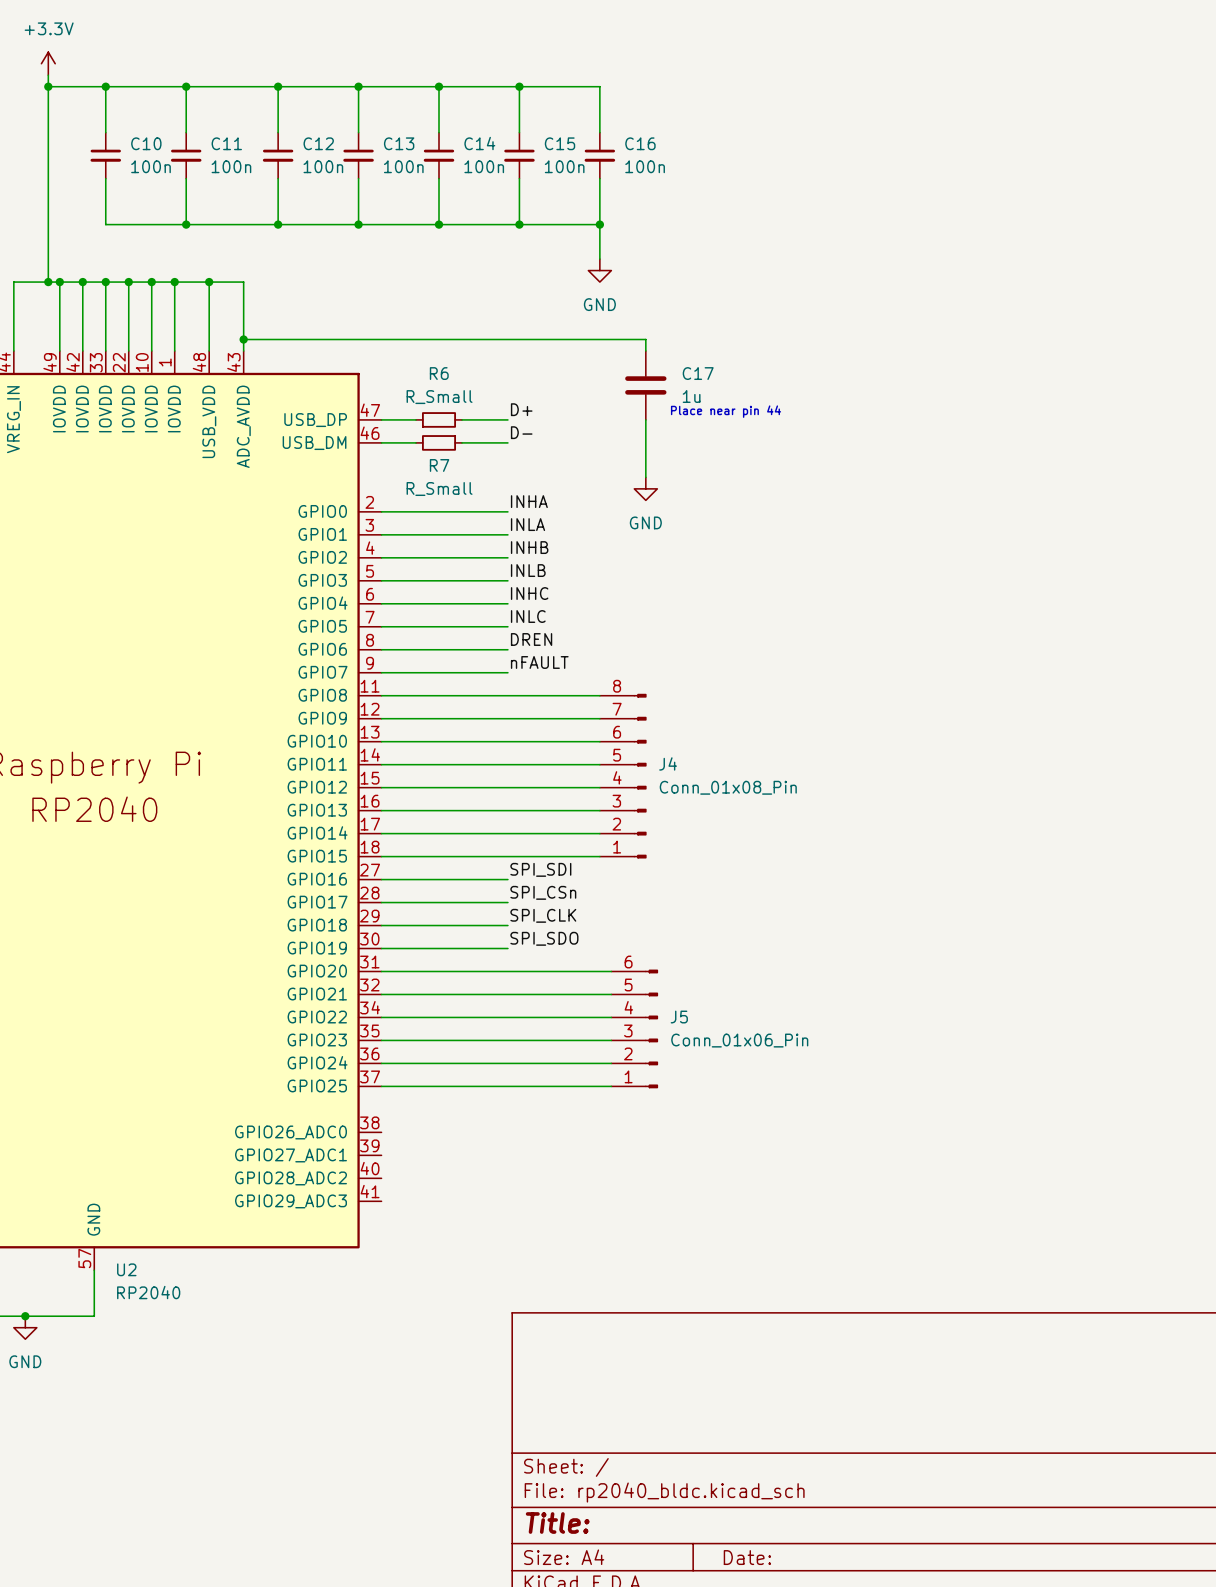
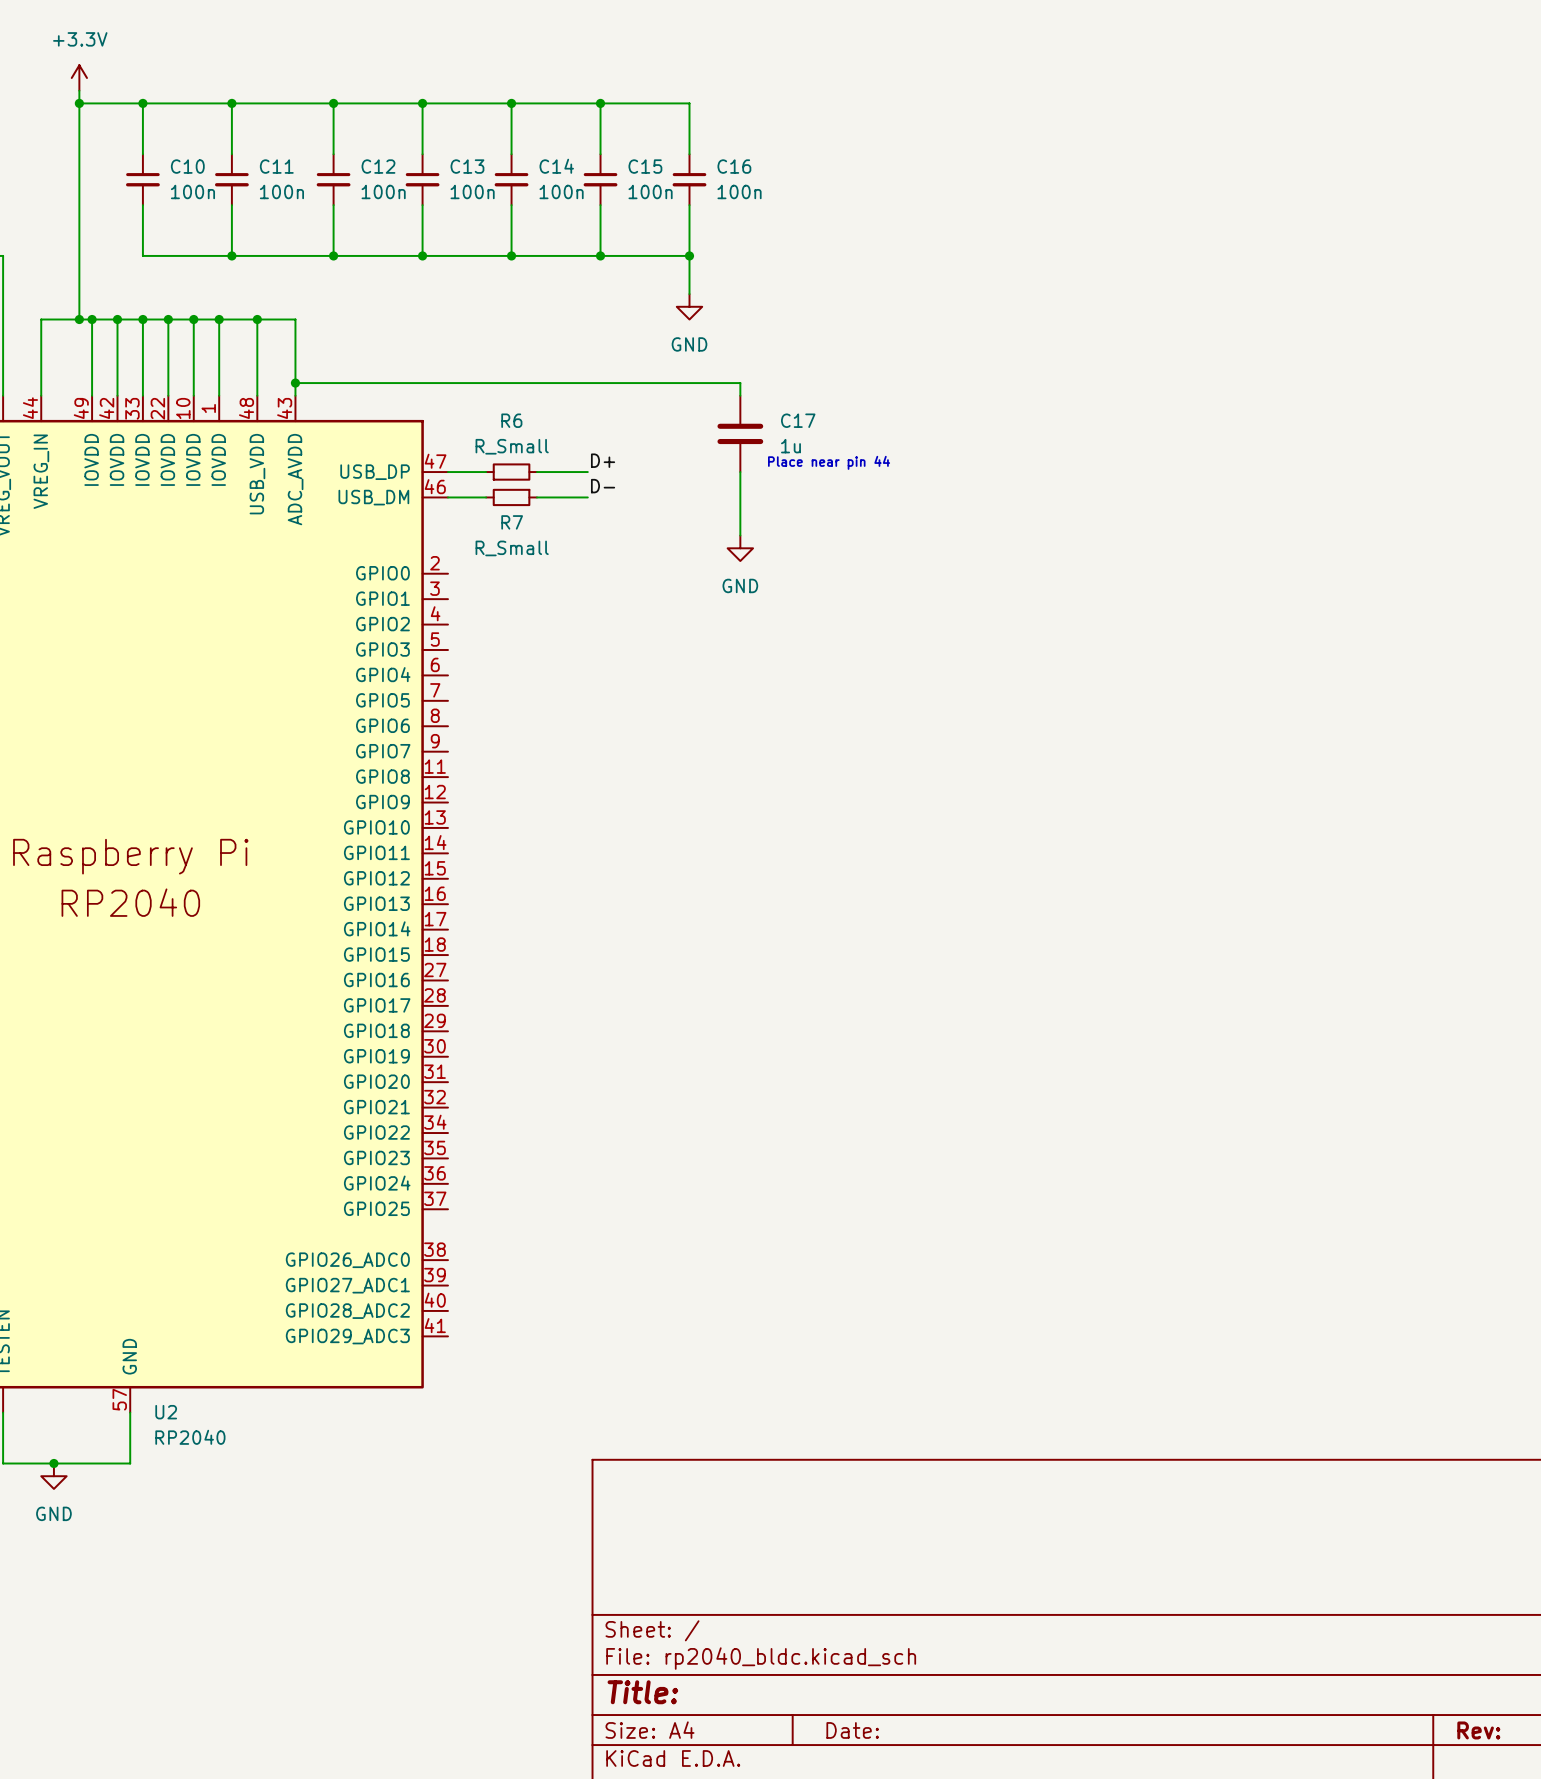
label: INHA (529, 501) -> none
wire: (381, 511) (507, 511) -> none
label: INLA (528, 524) -> none
wire: (381, 534) (507, 534) -> none
label: INHB (529, 547) -> none
wire: (381, 557) (507, 557) -> none
label: INLB (528, 570) -> none
wire: (381, 580) (507, 580) -> none
label: INHC (529, 593) -> none
wire: (381, 603) (507, 603) -> none
label: INLC (528, 616) -> none
wire: (381, 626) (507, 626) -> none
label: DREN (531, 639) -> none
wire: (381, 649) (507, 649) -> none
label: nFAULT (539, 662) -> none
wire: (381, 672) (507, 672) -> none
wire: (381, 695) (599, 695) -> none
wire: (381, 718) (599, 718) -> none
wire: (381, 741) (599, 741) -> none
wire: (381, 764) (599, 764) -> none
J4: Conn_01x08_Pin (623, 776) -> none
wire: (381, 787) (599, 787) -> none
wire: (381, 810) (599, 810) -> none
wire: (381, 833) (599, 833) -> none
wire: (381, 856) (599, 856) -> none
label: SPI_SDI (540, 869) -> none
wire: (381, 879) (507, 879) -> none
label: SPI_CSn (543, 892) -> none
wire: (381, 902) (507, 902) -> none
label: SPI_CLK (543, 915) -> none
wire: (381, 925) (507, 925) -> none
label: SPI_SDO (544, 938) -> none
wire: (381, 948) (507, 948) -> none
wire: (381, 971) (611, 971) -> none
wire: (381, 994) (611, 994) -> none
wire: (381, 1017) (611, 1017) -> none
J5: Conn_01x06_Pin (634, 1028) -> none
wire: (381, 1040) (611, 1040) -> none
wire: (381, 1063) (611, 1063) -> none
wire: (381, 1086) (611, 1086) -> none

